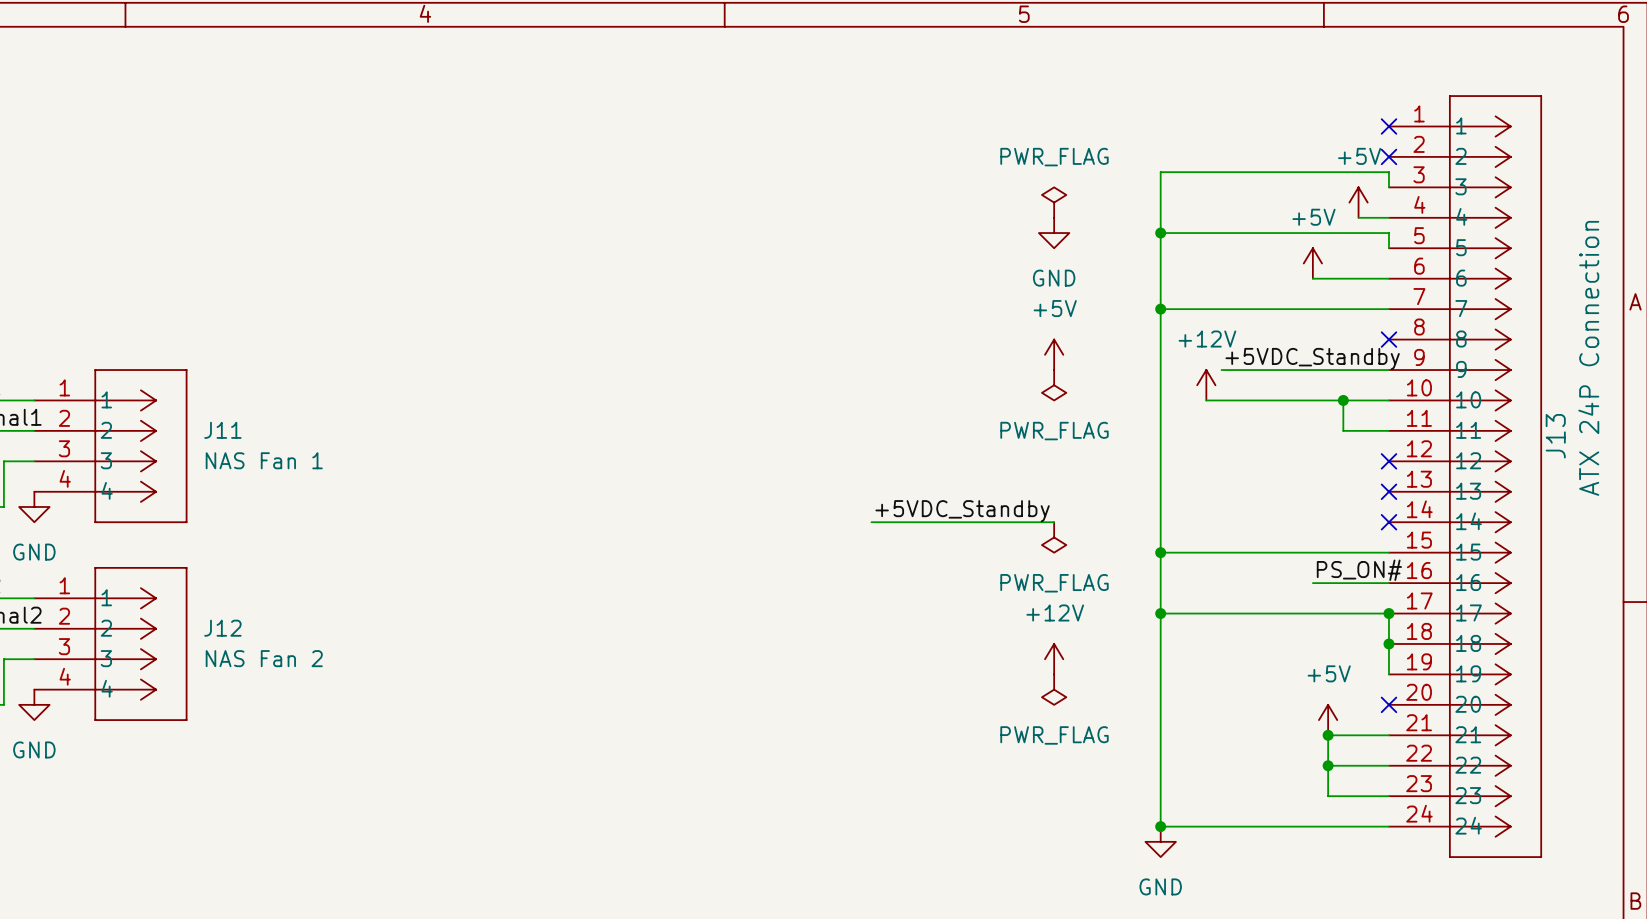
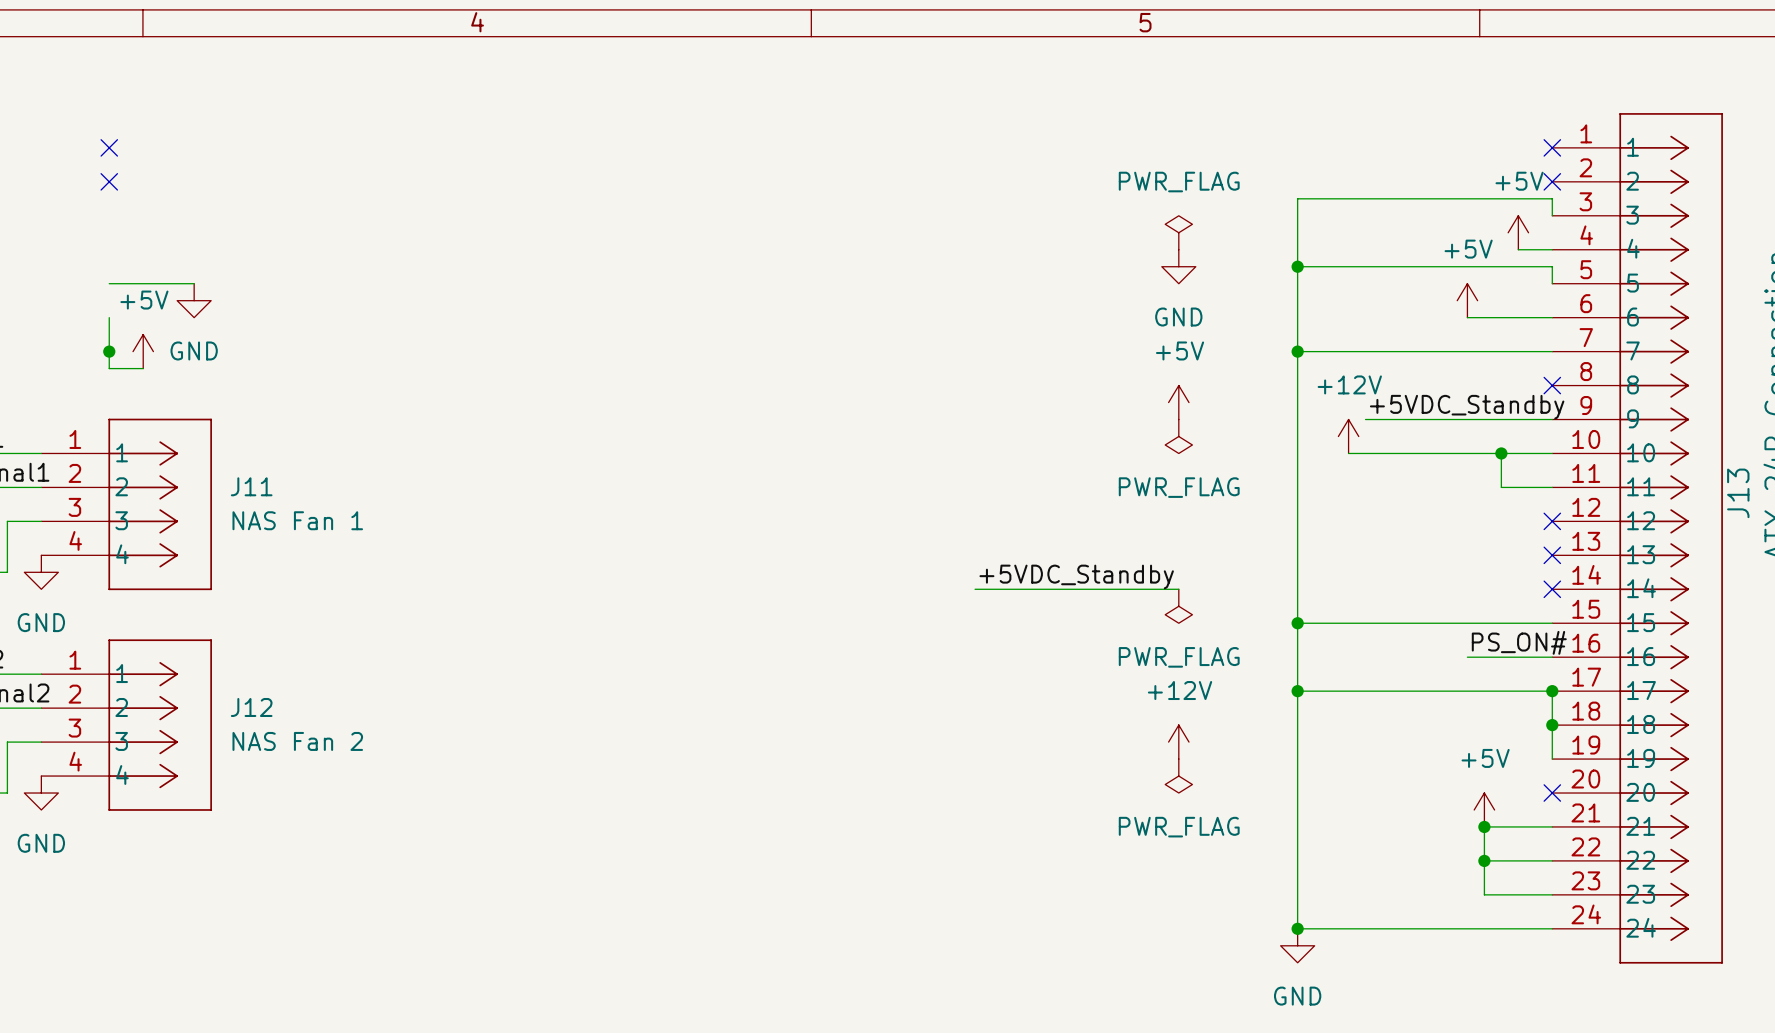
no-connect mark: none -> (109, 147)
no-connect mark: none -> (109, 181)
wire: none -> (109, 283) (194, 283)
power symbol: none -> GND (194, 300)
wire: none -> (109, 317) (109, 368) (143, 368)
junction: none -> (109, 351)
power symbol: none -> +5V (143, 351)

